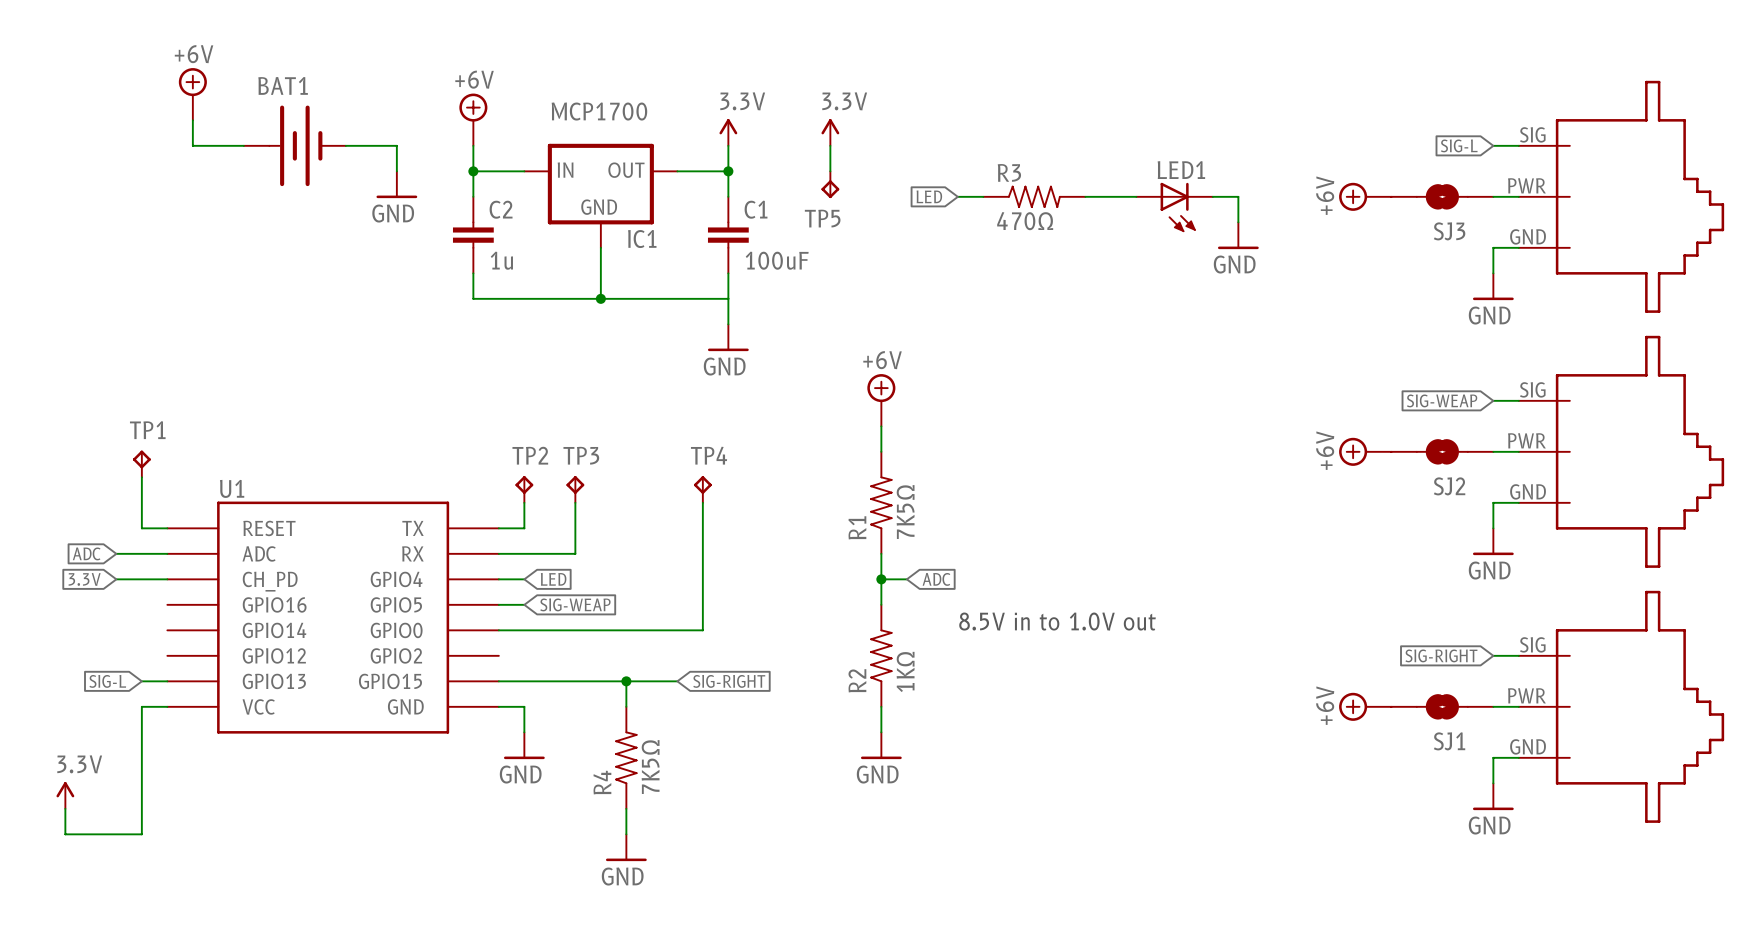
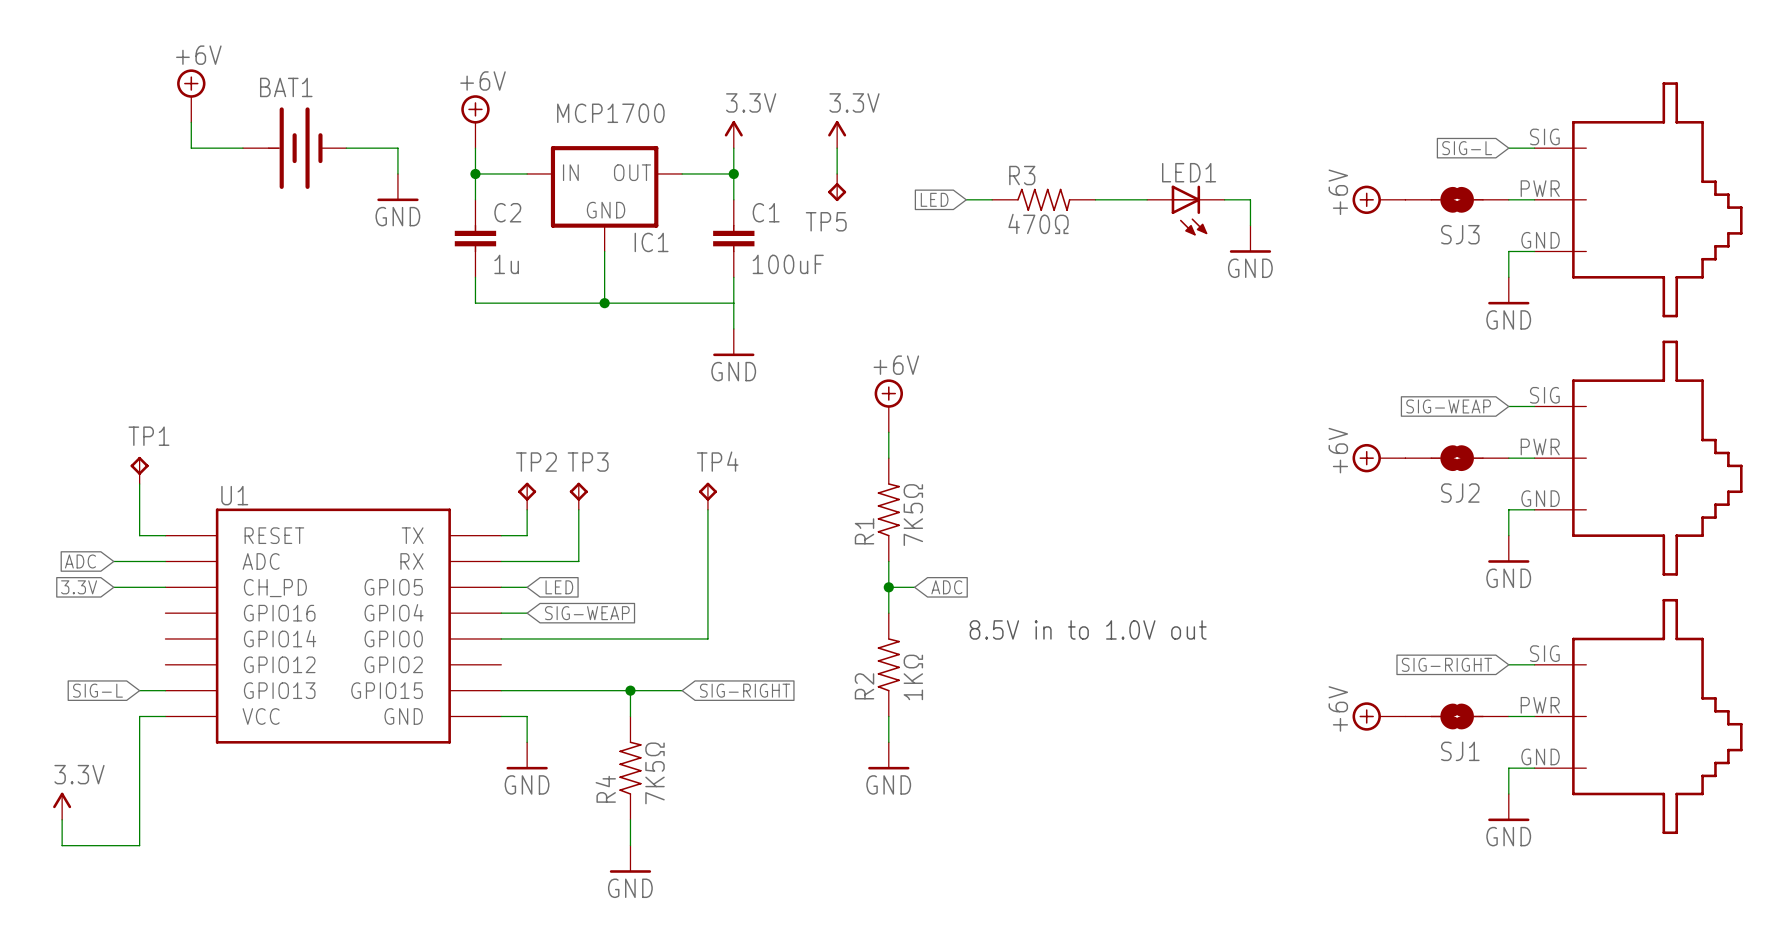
U1 pin name: GPIO4 (396, 579) -> GPIO5 (393, 587)
U1 pin name: GPIO5 (396, 604) -> GPIO4 (394, 612)

